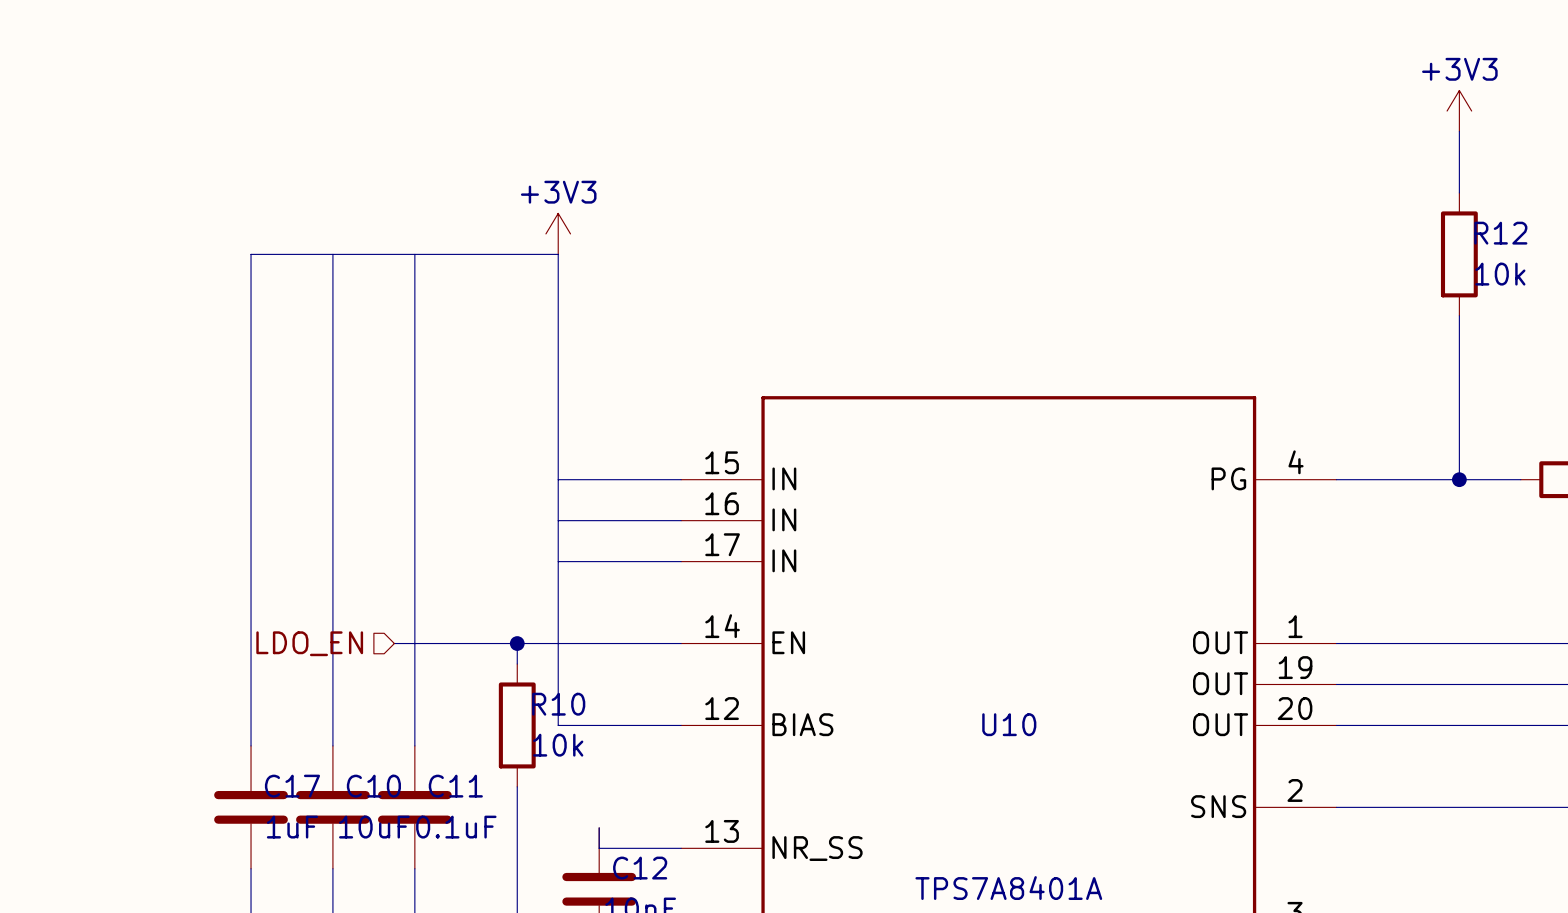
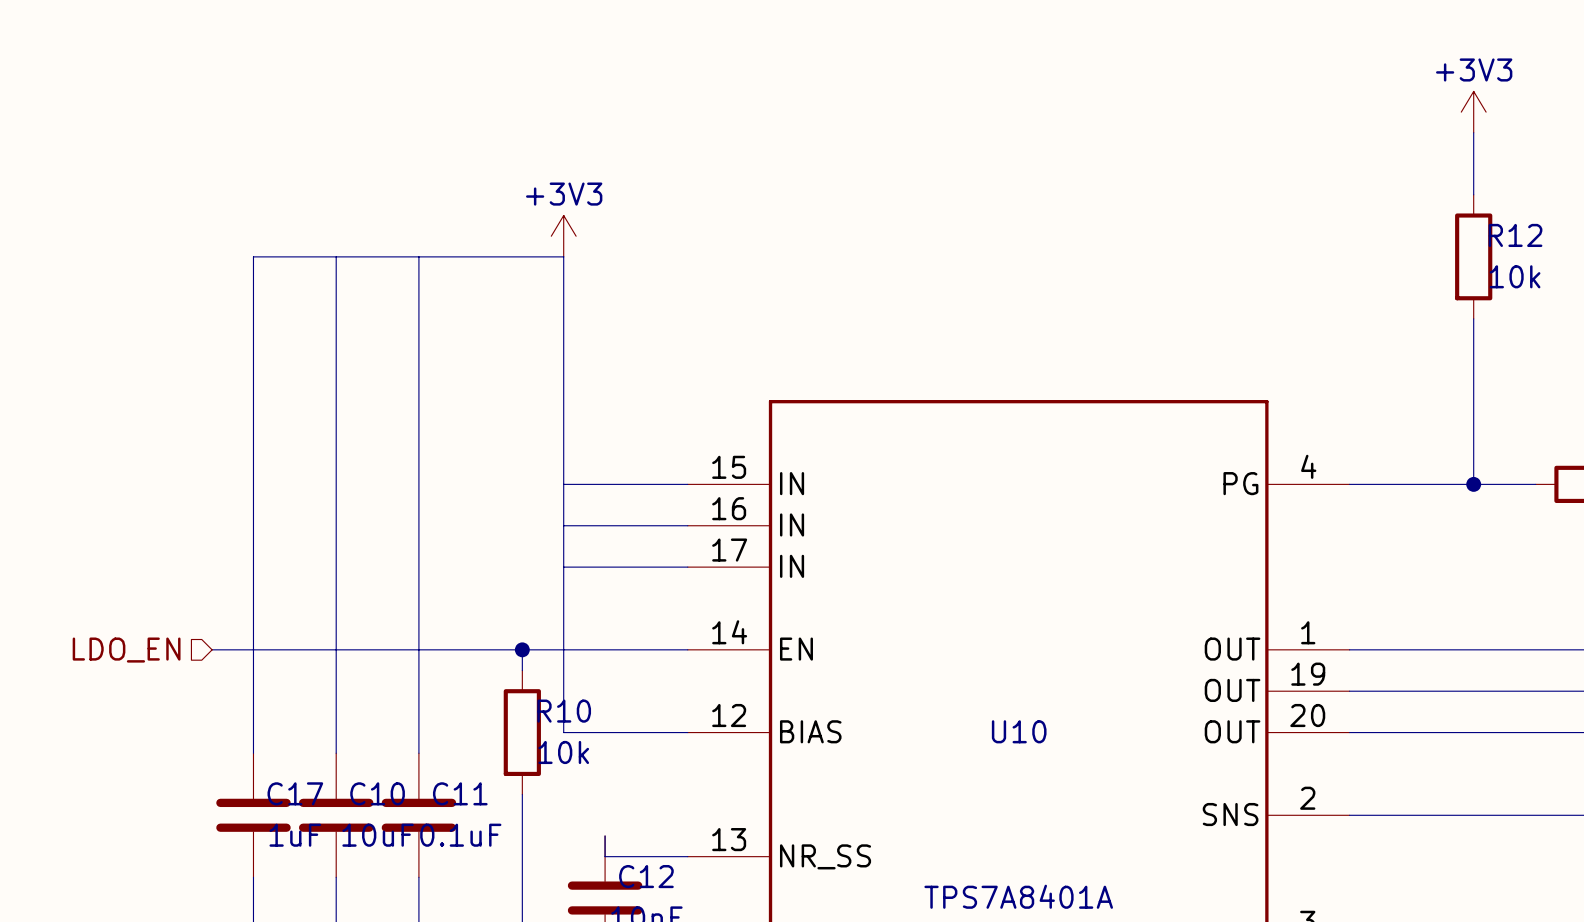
wire: none -> (212, 649) (398, 649)
hierarchical label position: LDO_EN (309, 643) -> LDO_EN (126, 650)

